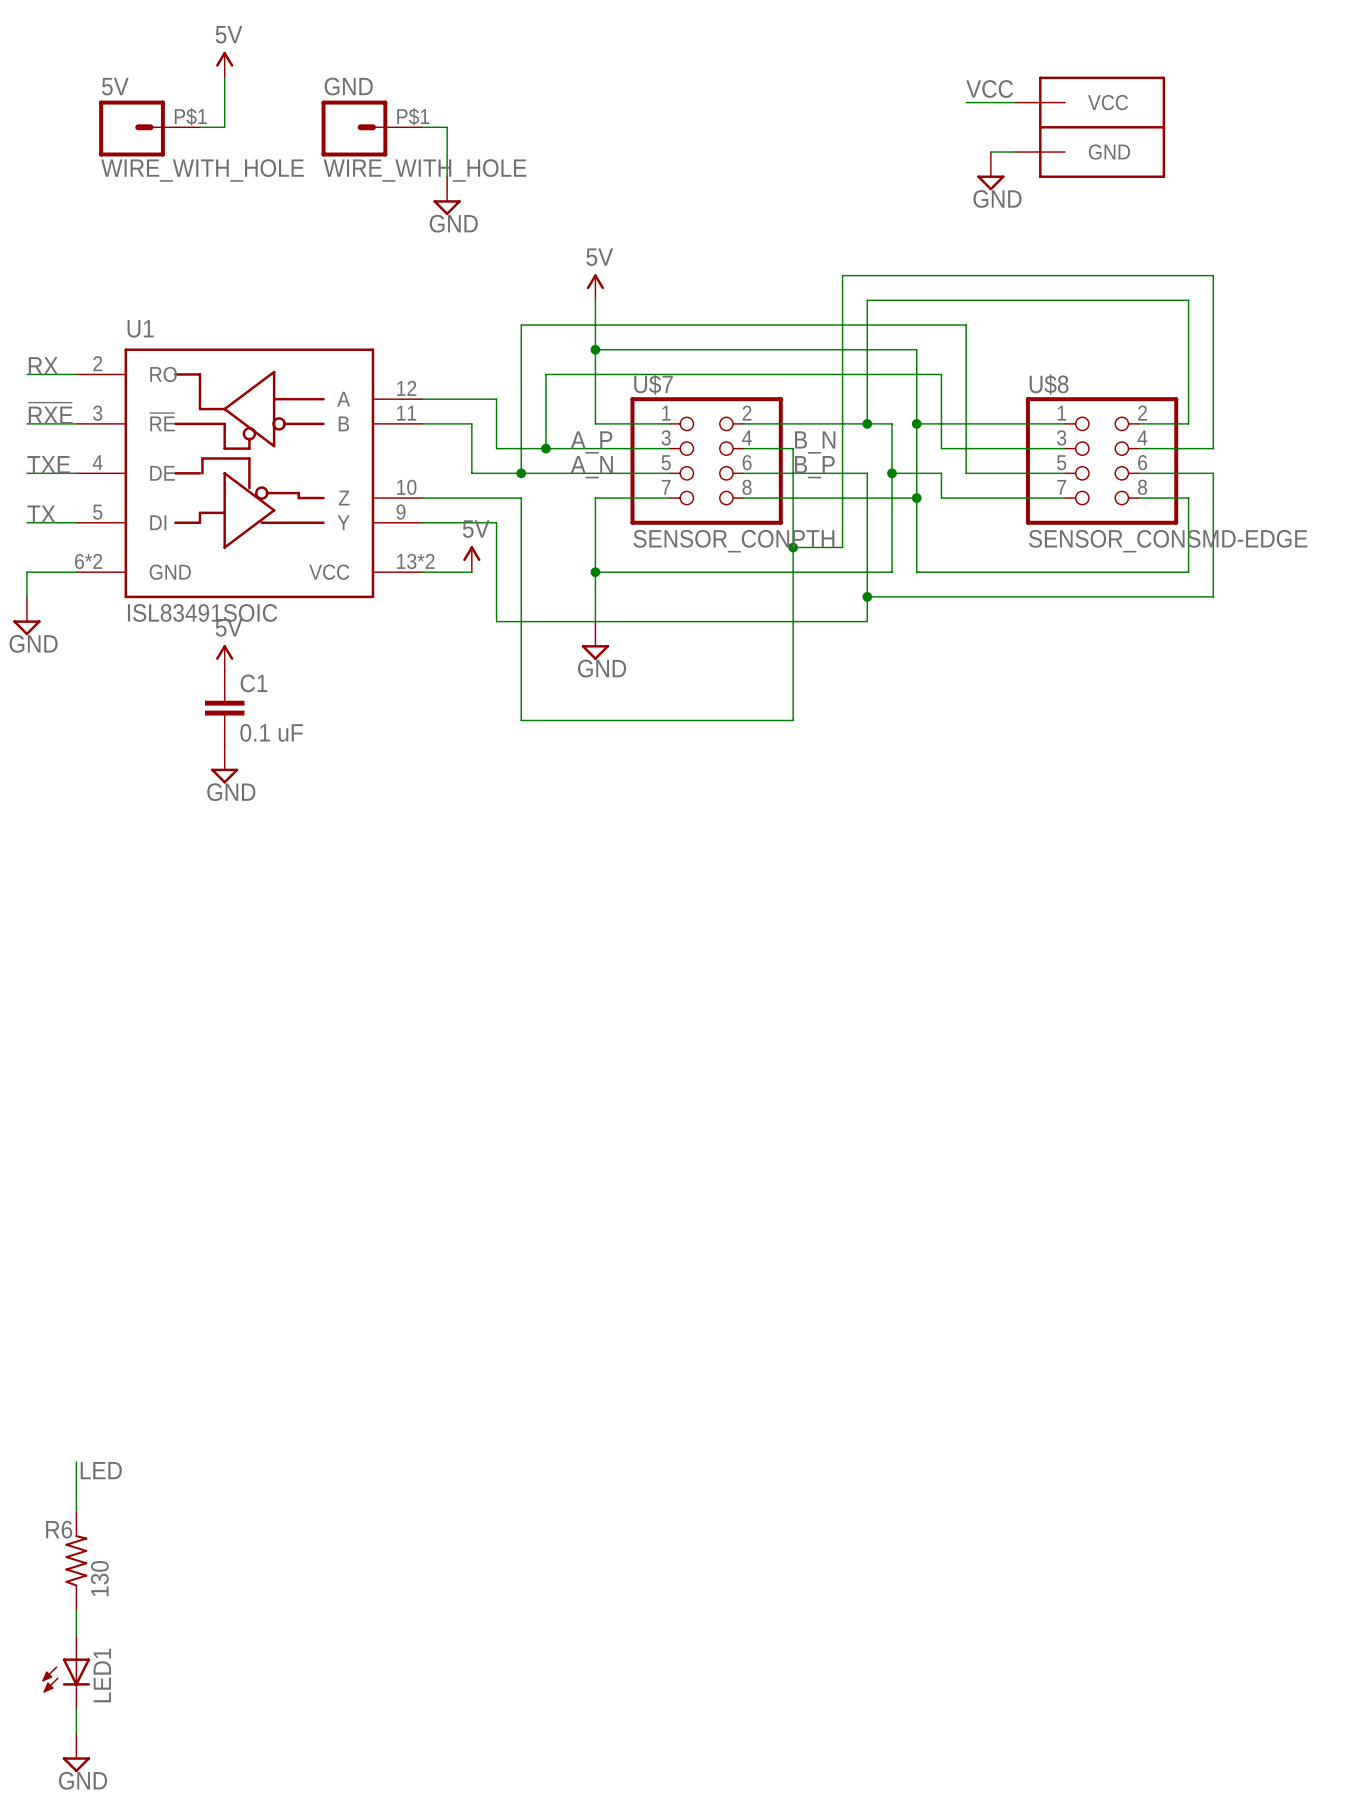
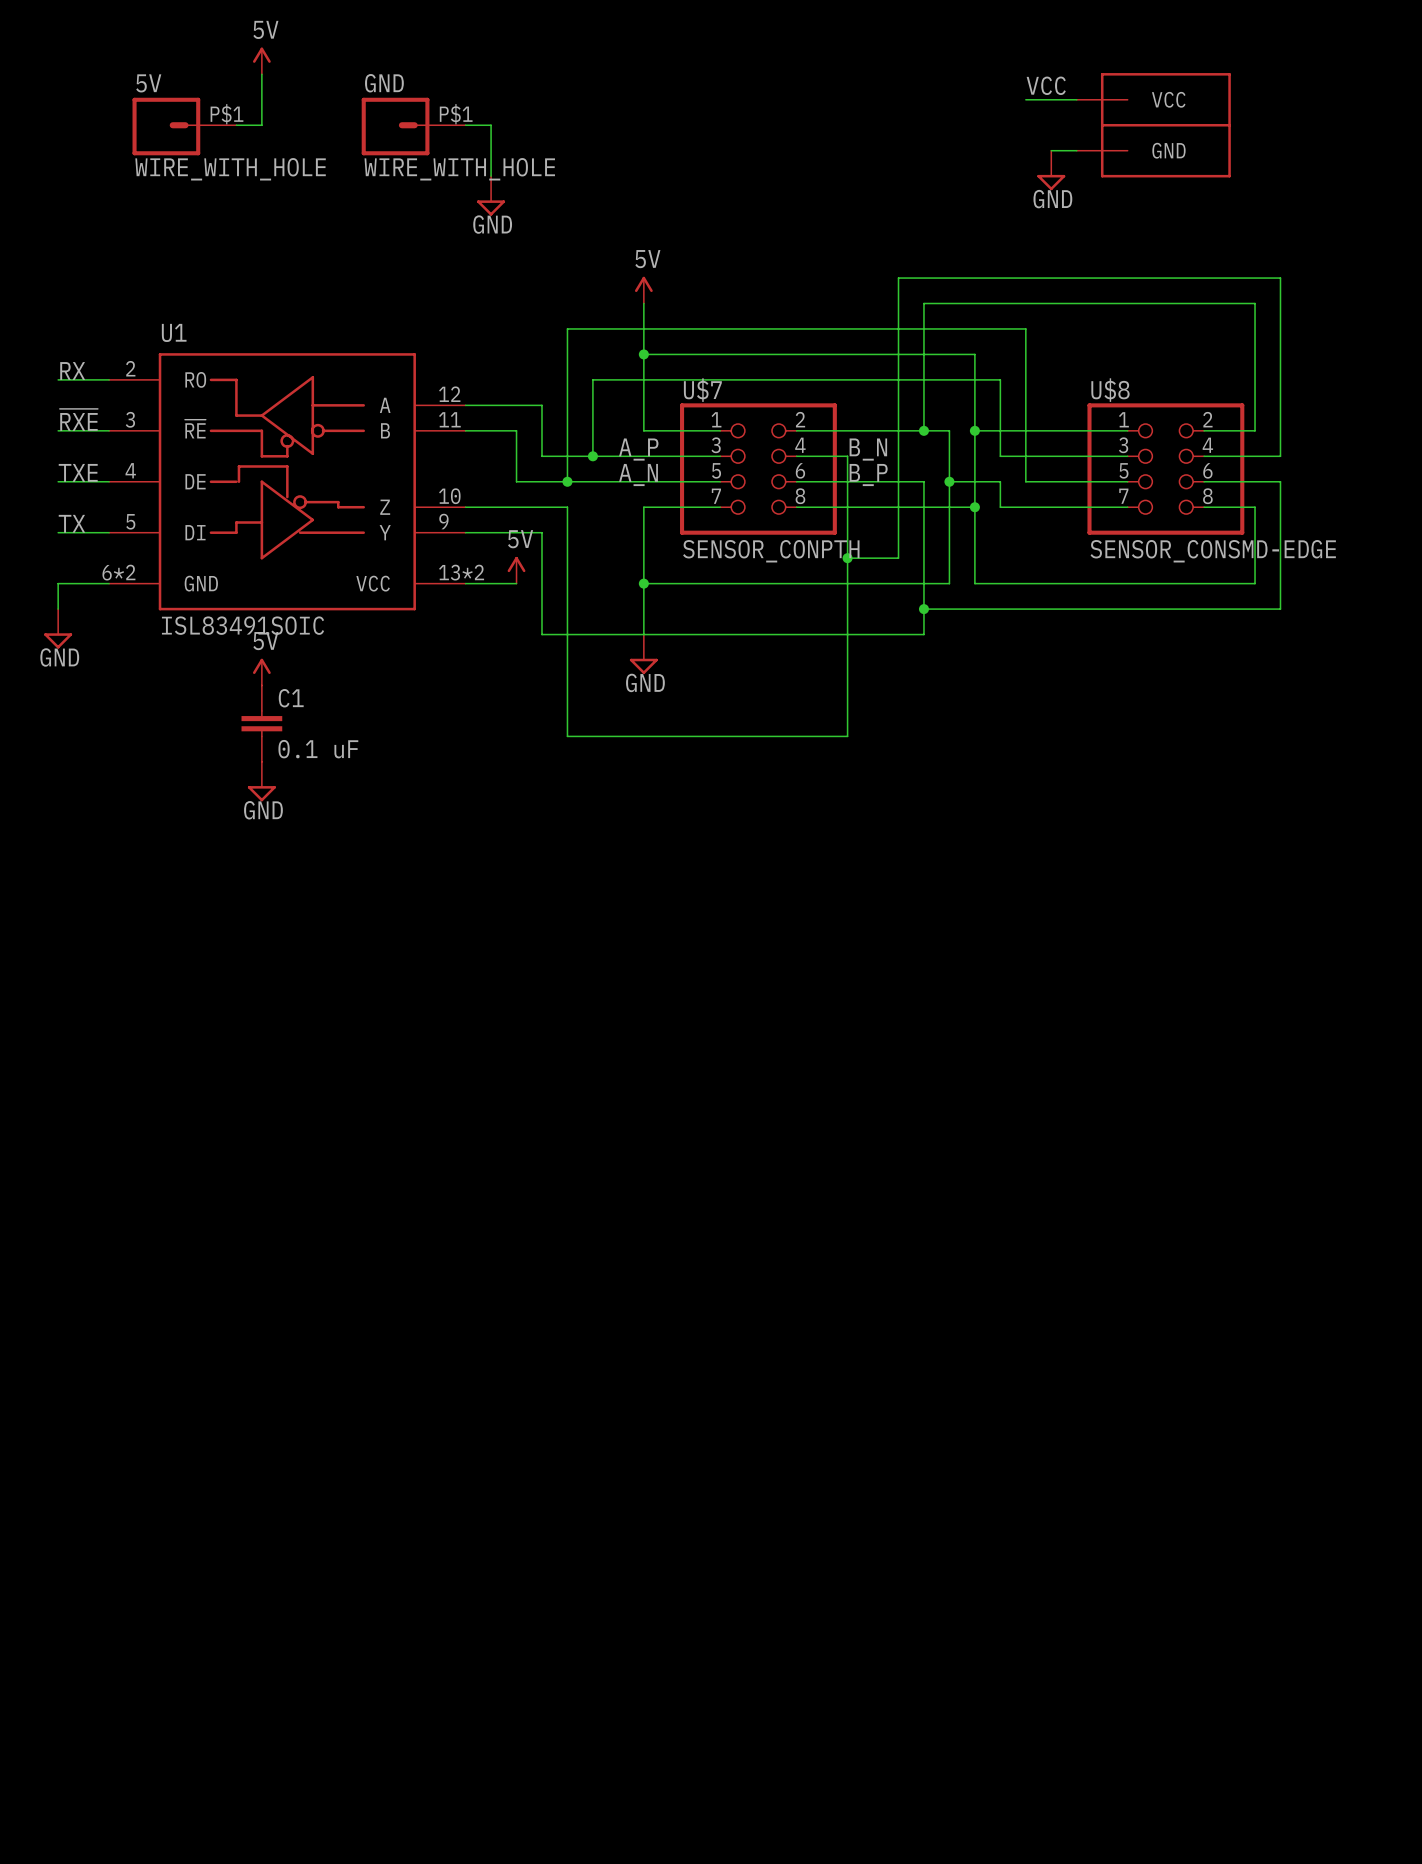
wire: (76, 1461) (76, 1511) -> none
label: LED (101, 1470) -> none
R6: 130 (76, 1560) -> none
wire: (76, 1610) (76, 1634) -> none
LED1: (66, 1672) -> none
wire: (76, 1709) (76, 1733) -> none
power symbol: GND (76, 1752) -> none

